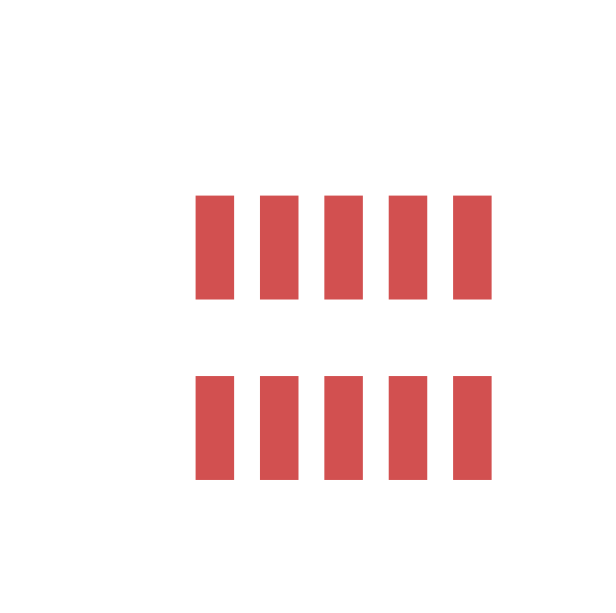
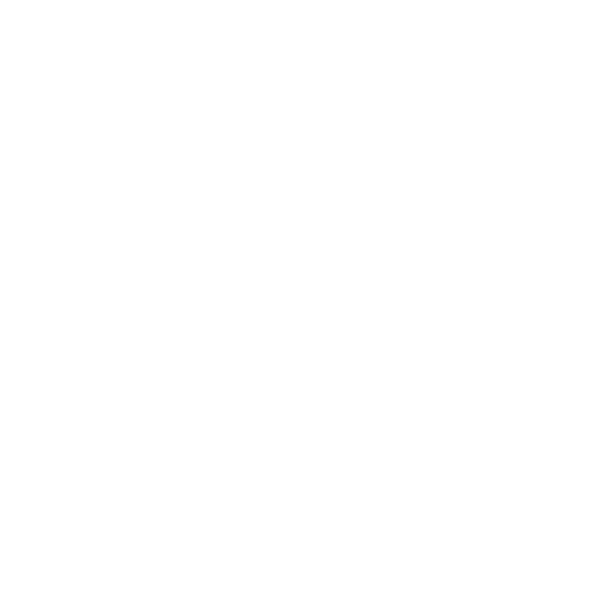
part: (343, 337) -> none

